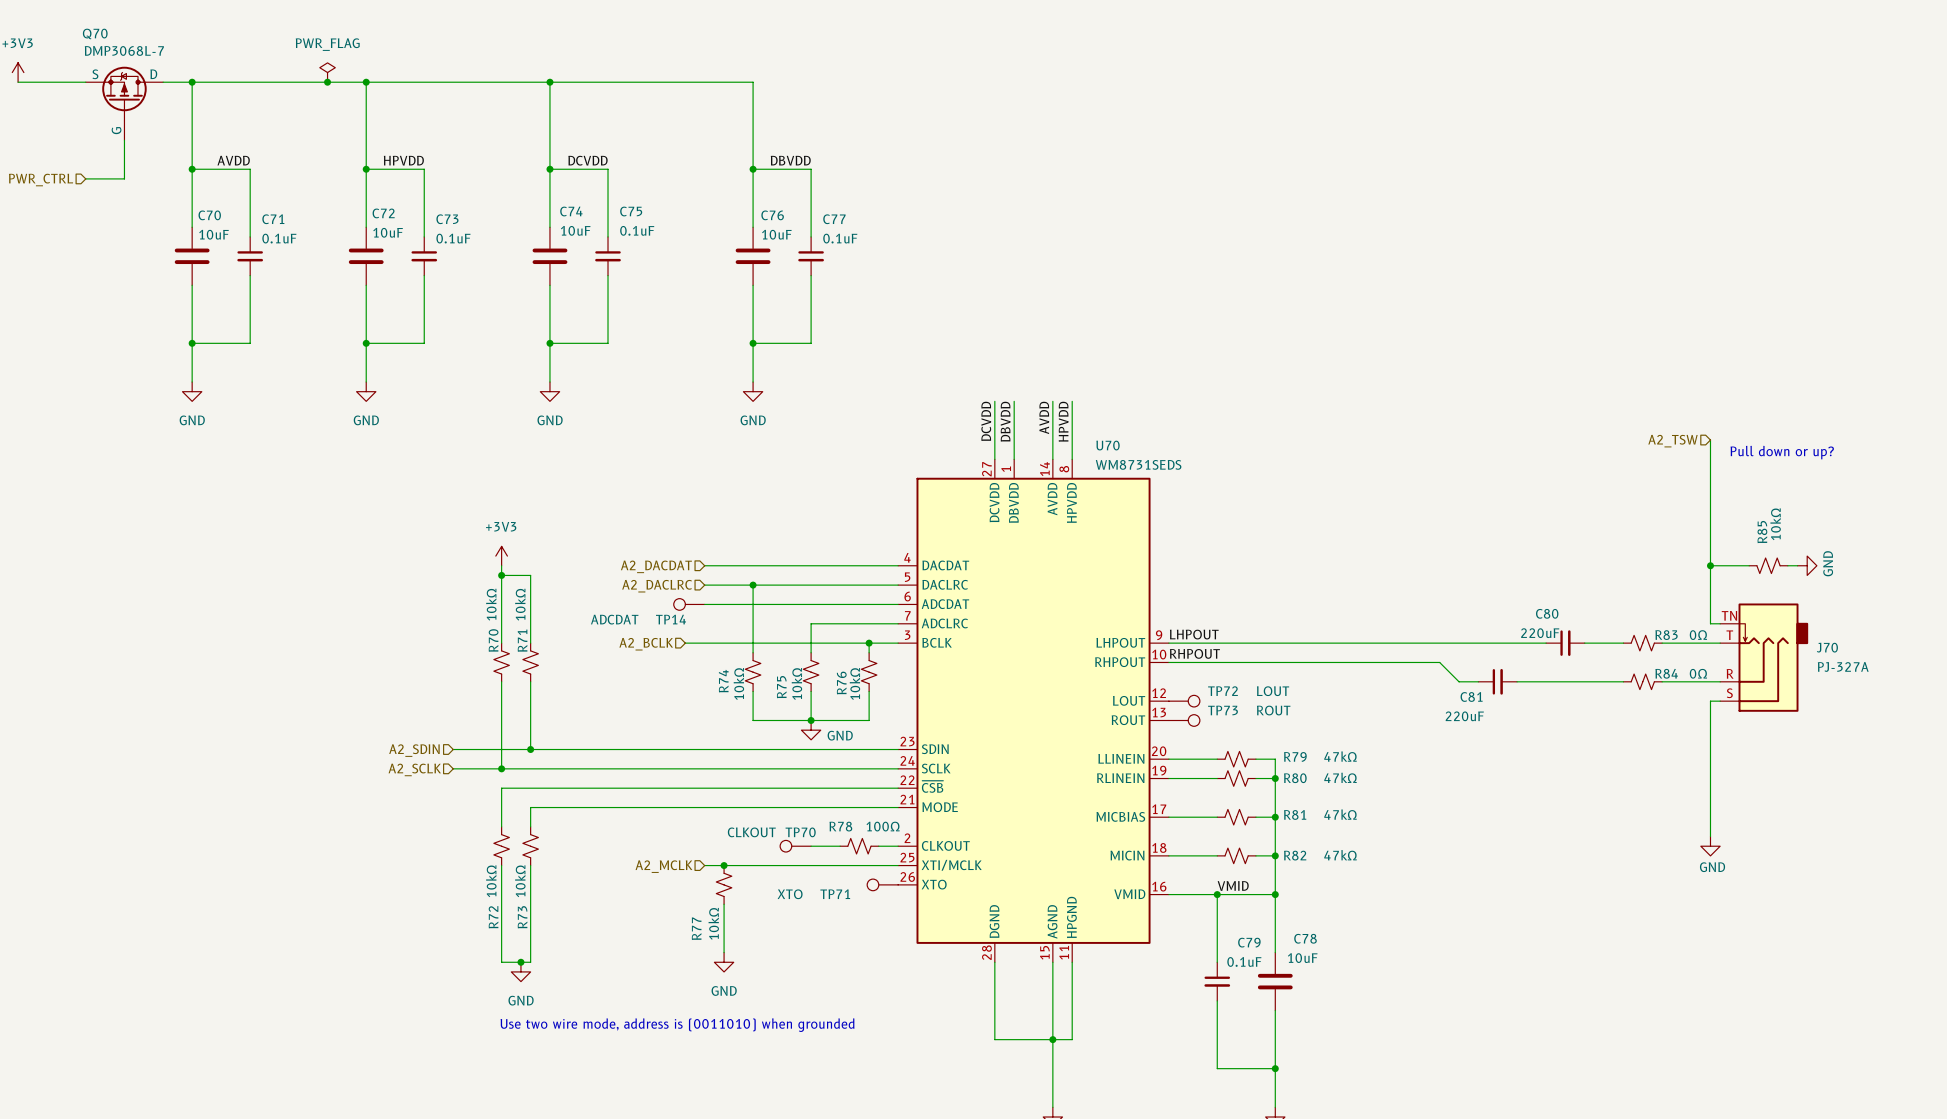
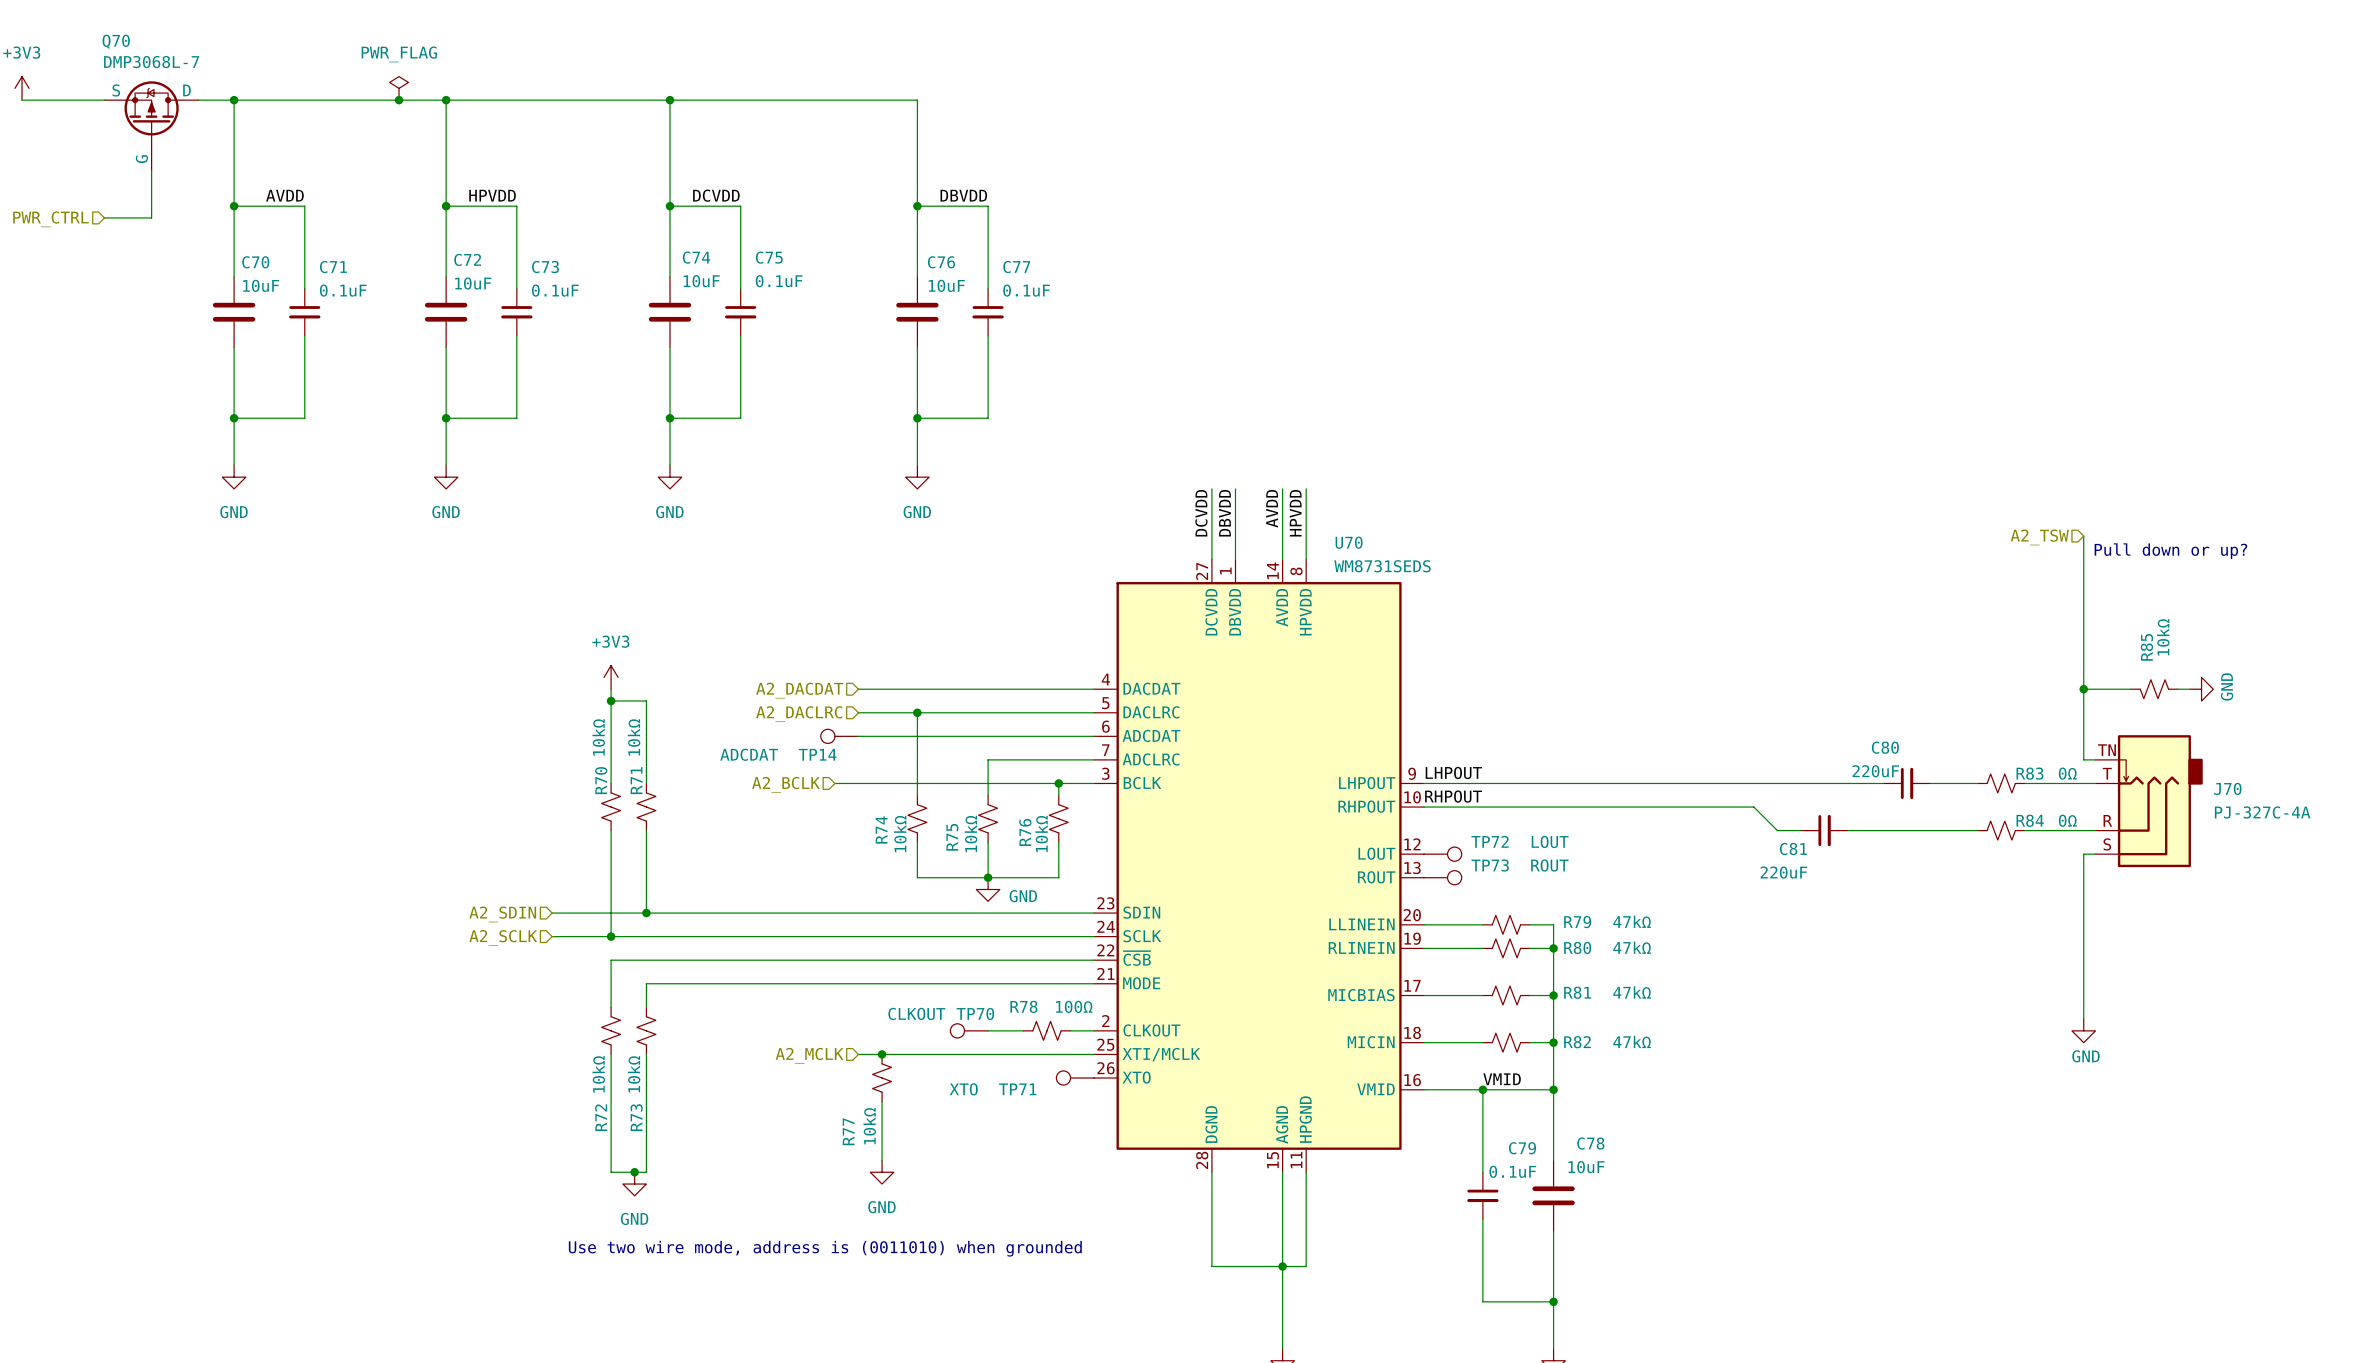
J70 value: PJ-327A (1843, 667) -> PJ-327C-4A (2262, 812)

